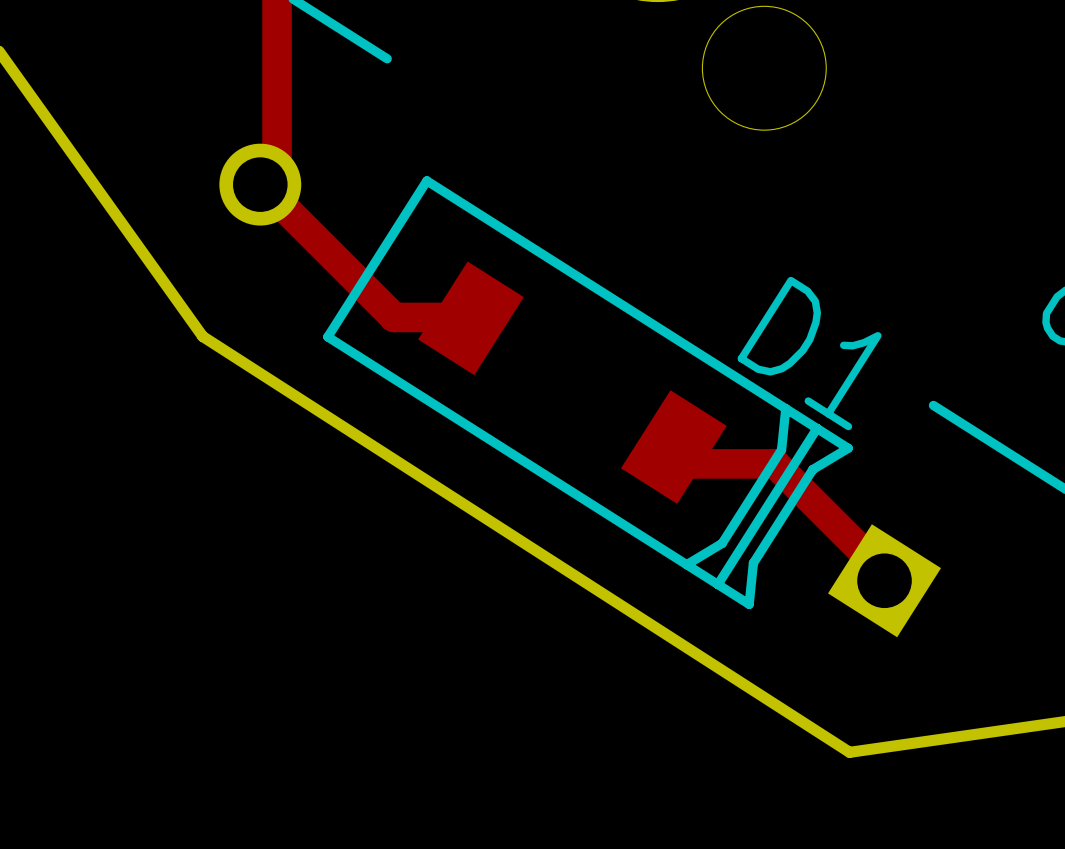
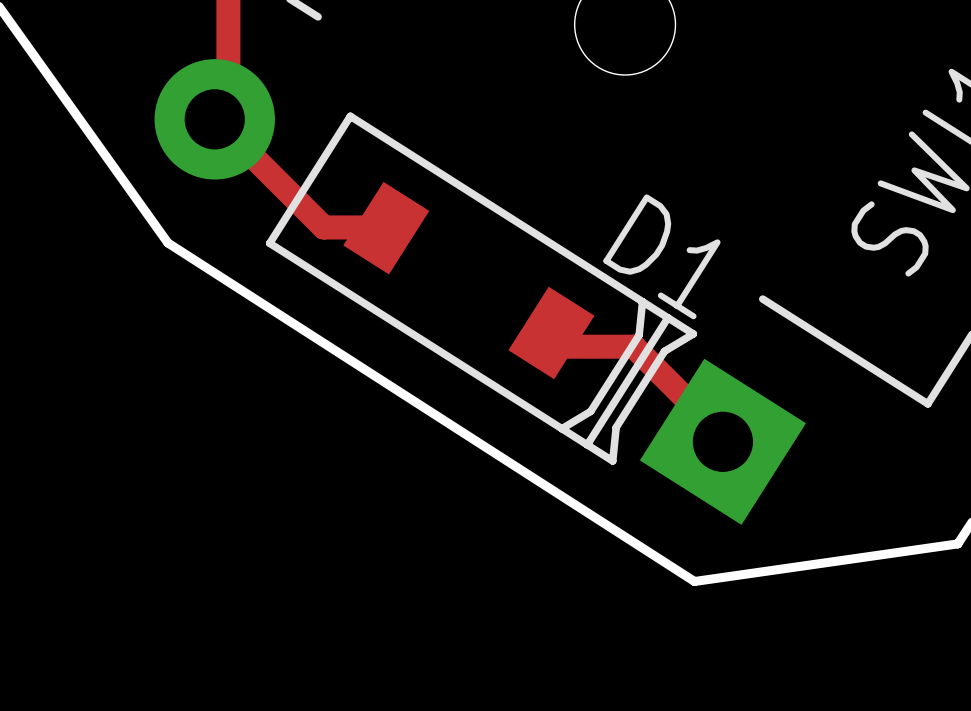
D1 footprint: [219, 143, 942, 638] -> [154, 59, 806, 525]

